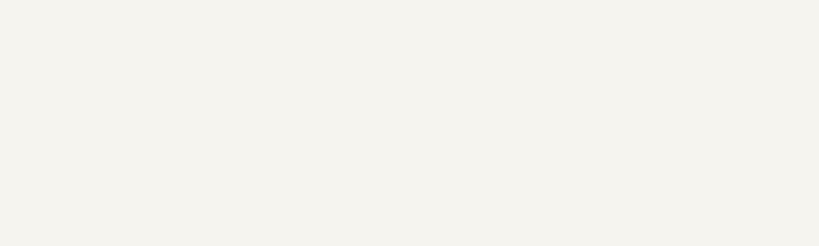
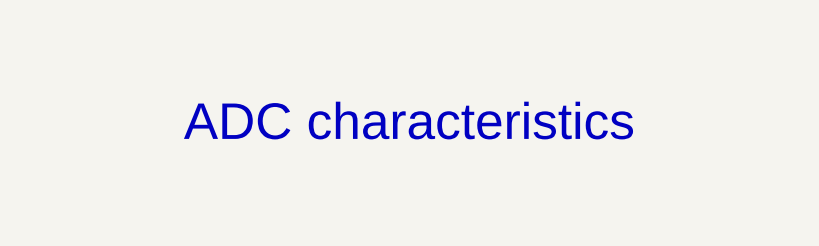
text: none -> ADC characteristics (408, 120)

